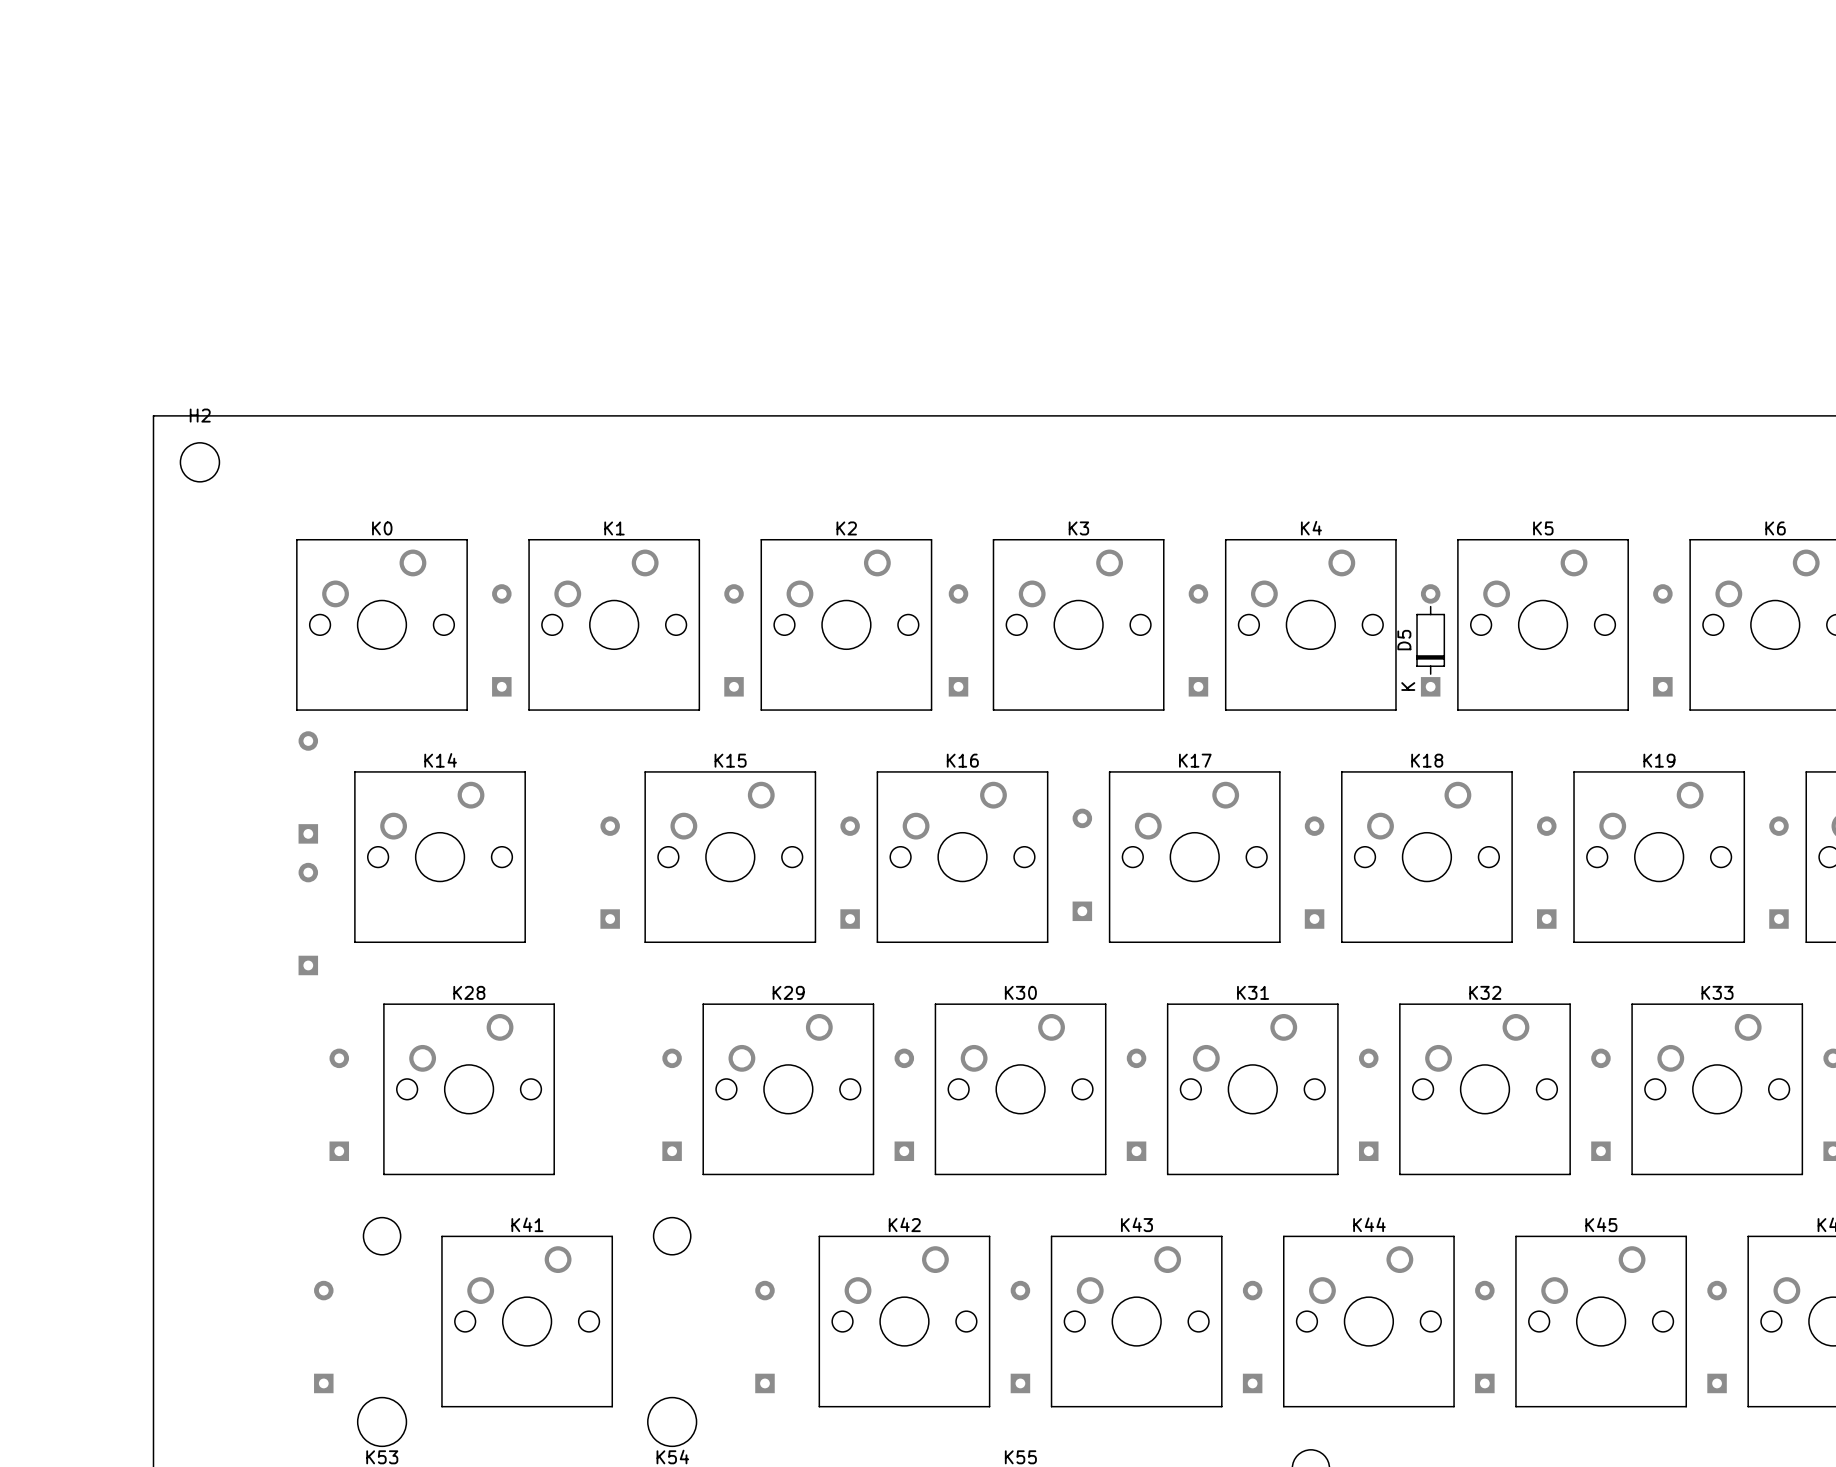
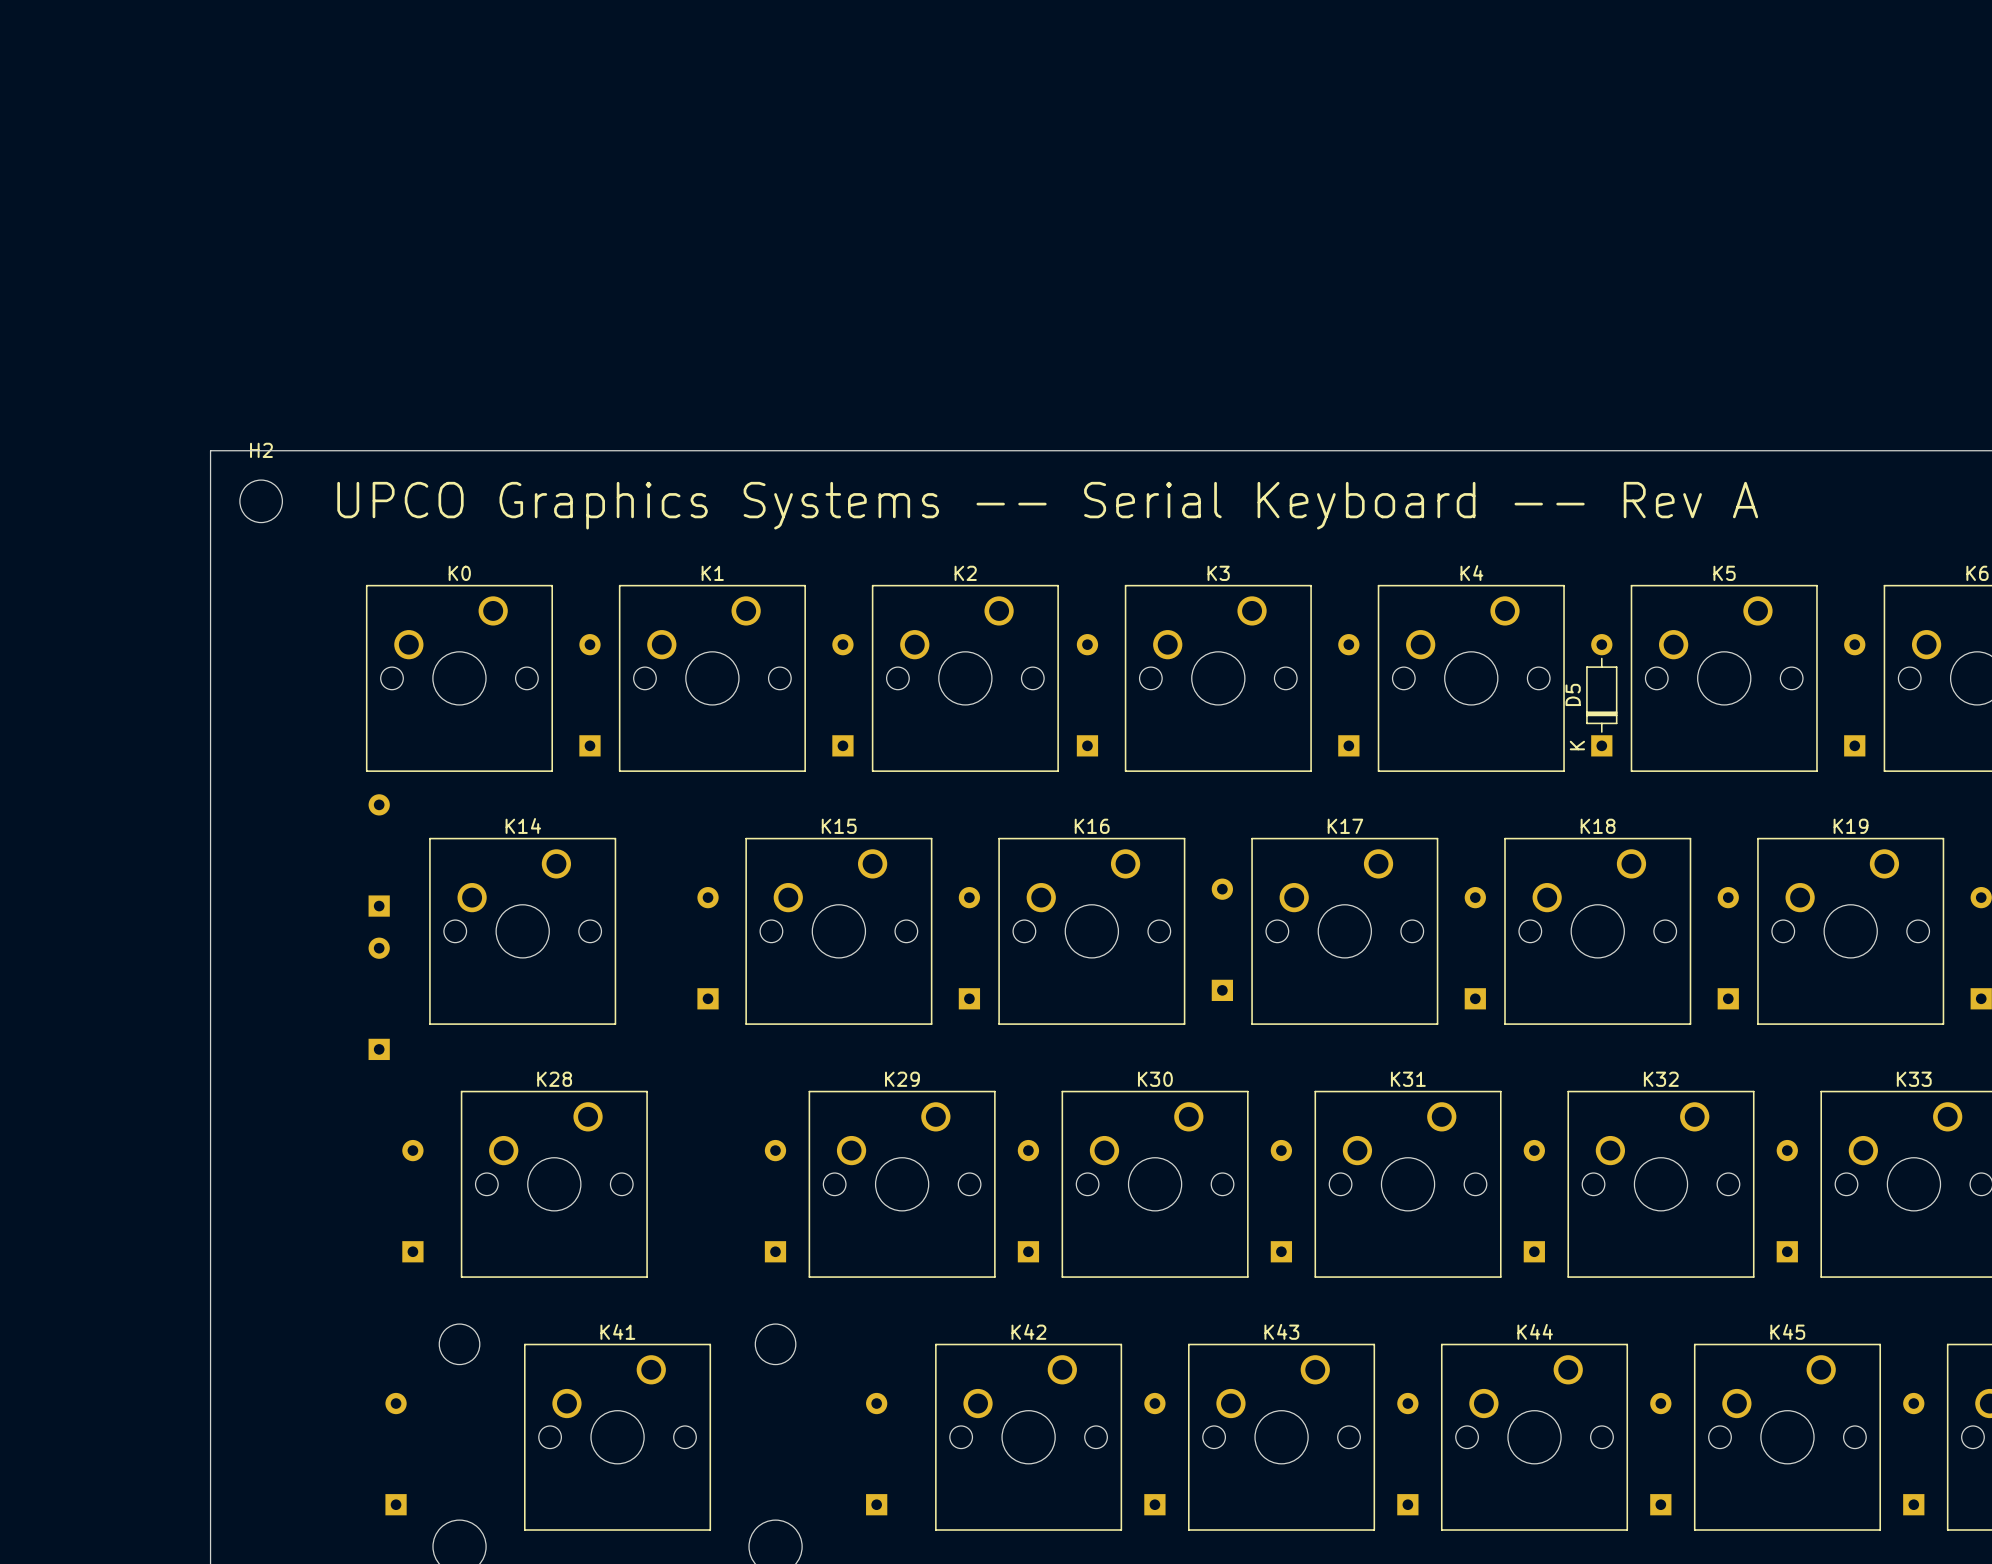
text: none -> UPCO Graphics Systems -- Serial Keyboard -- Rev A (1047, 505)

